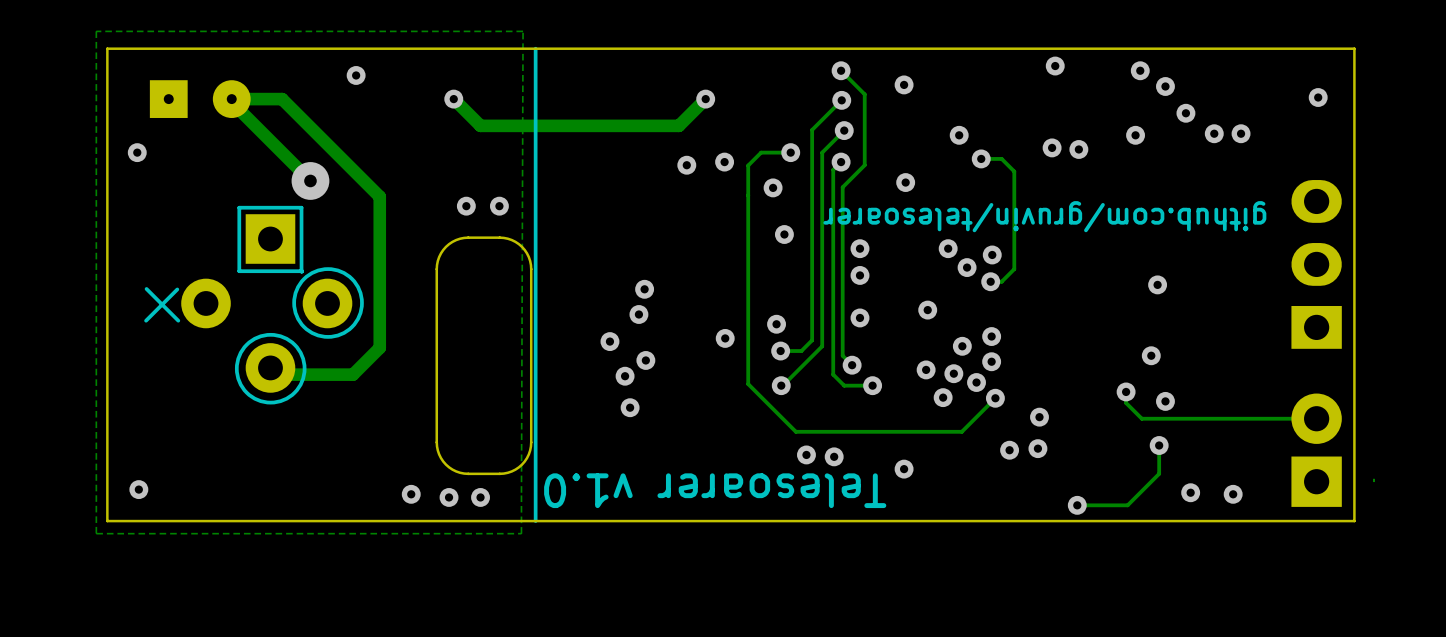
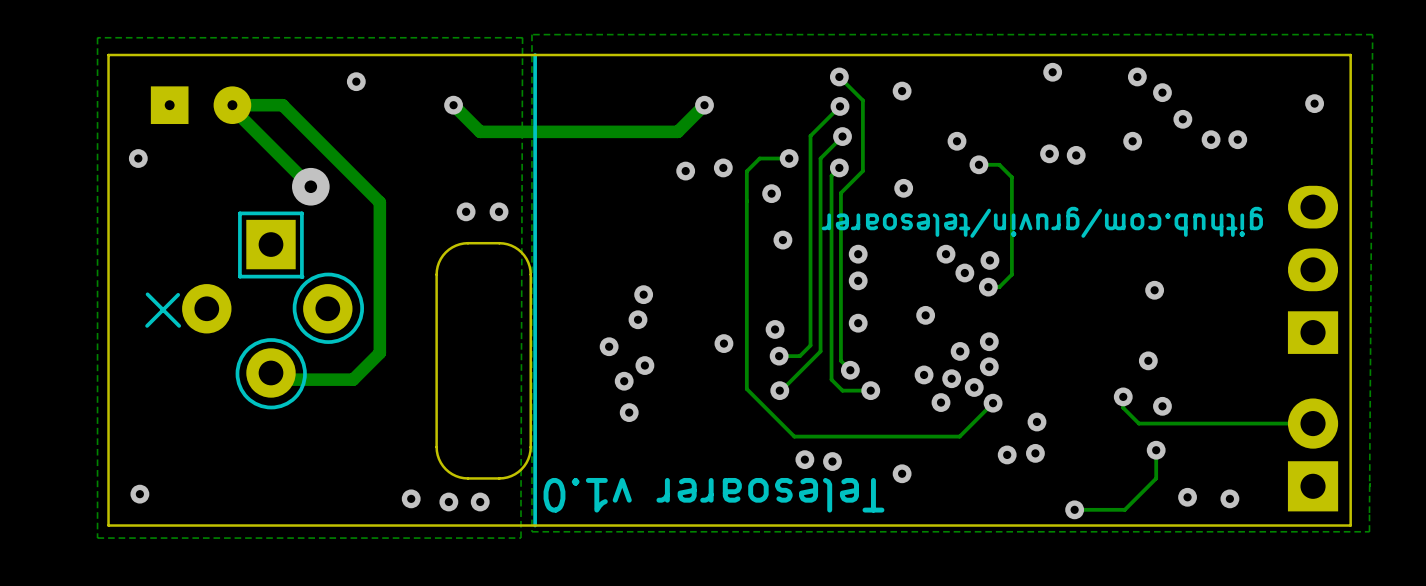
zone outline: none -> (1372, 34) (531, 34) (531, 531) (1369, 531) (1372, 34)

